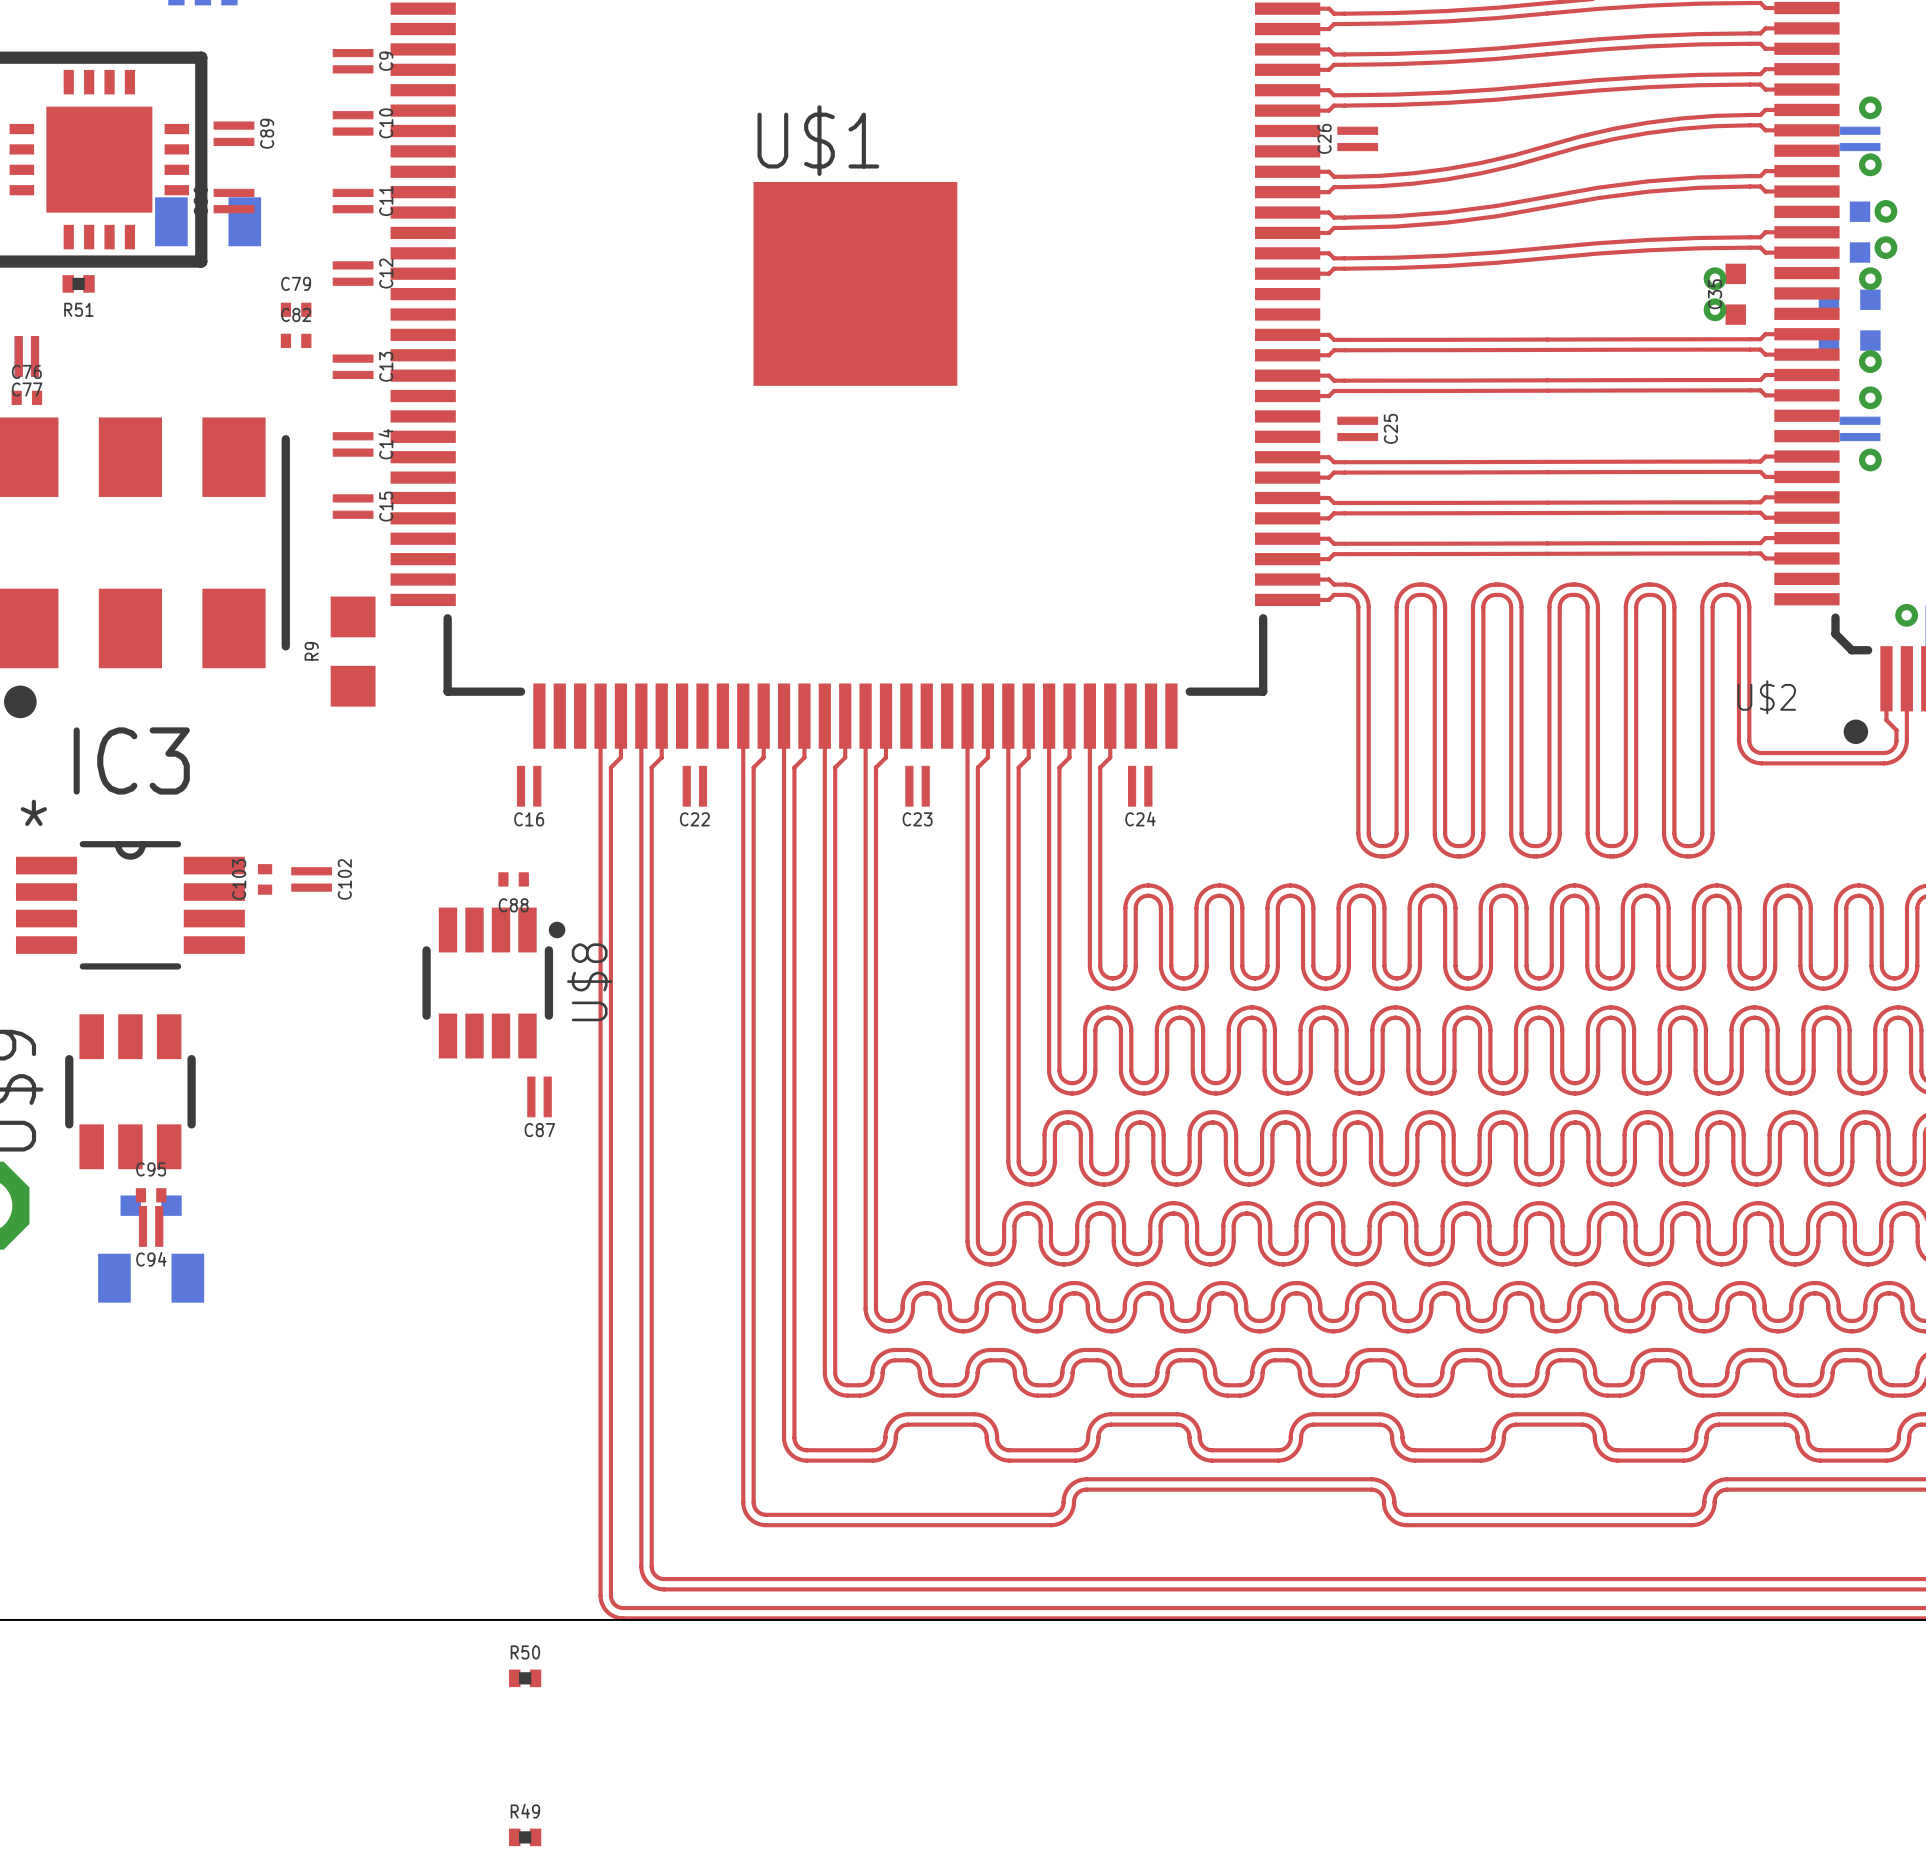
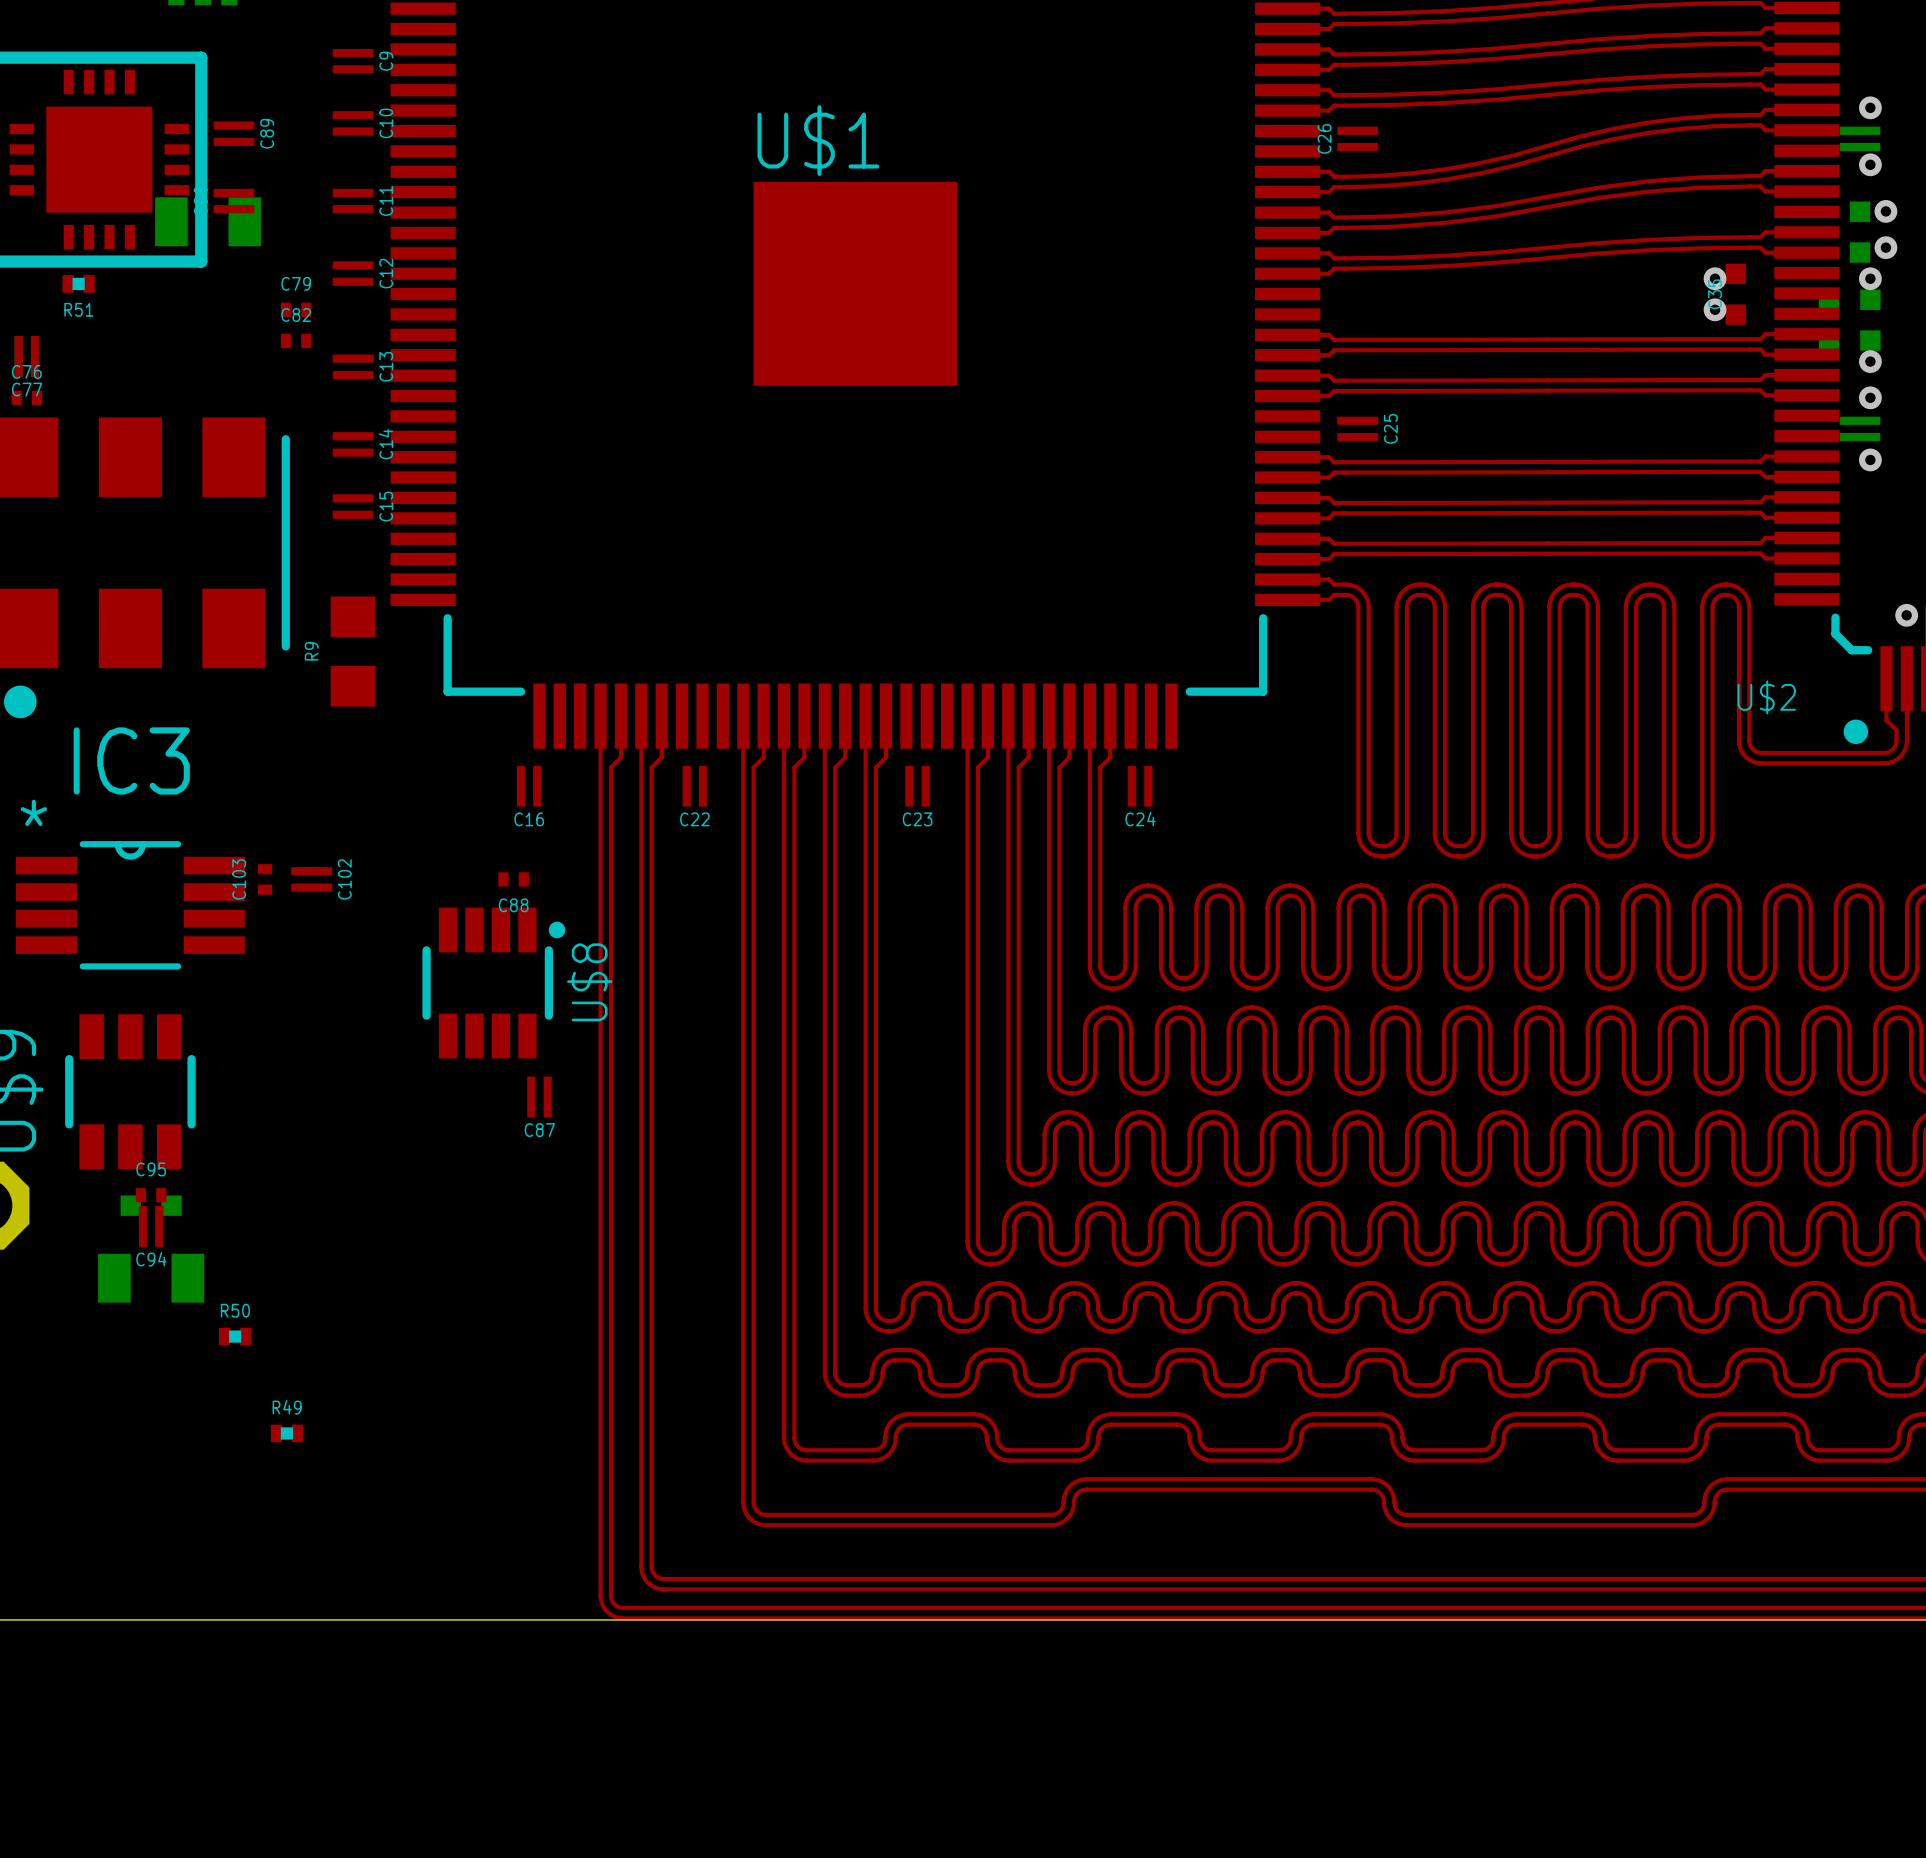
R50 position: (525, 1678) -> (235, 1336)
R49 position: (525, 1837) -> (286, 1433)

